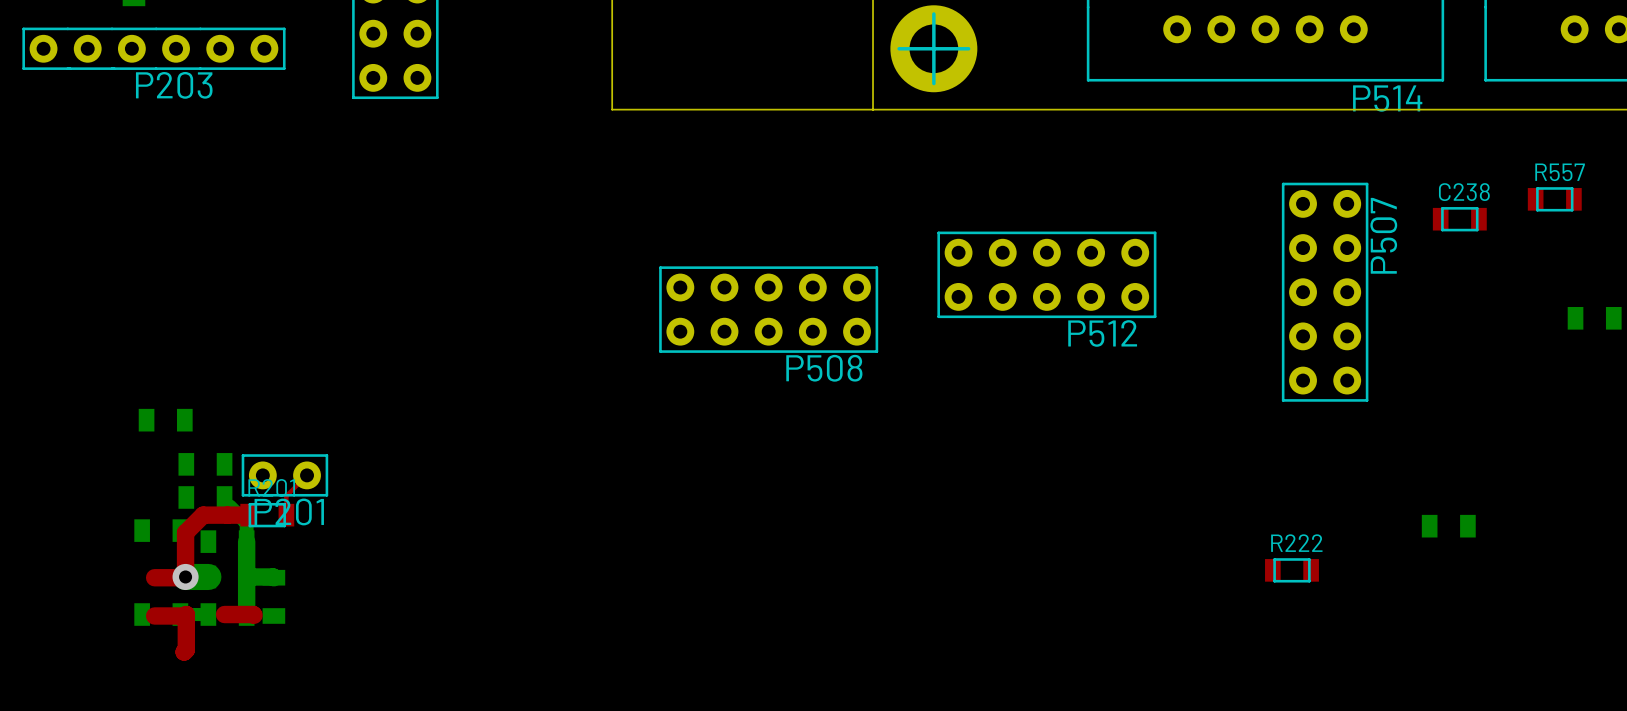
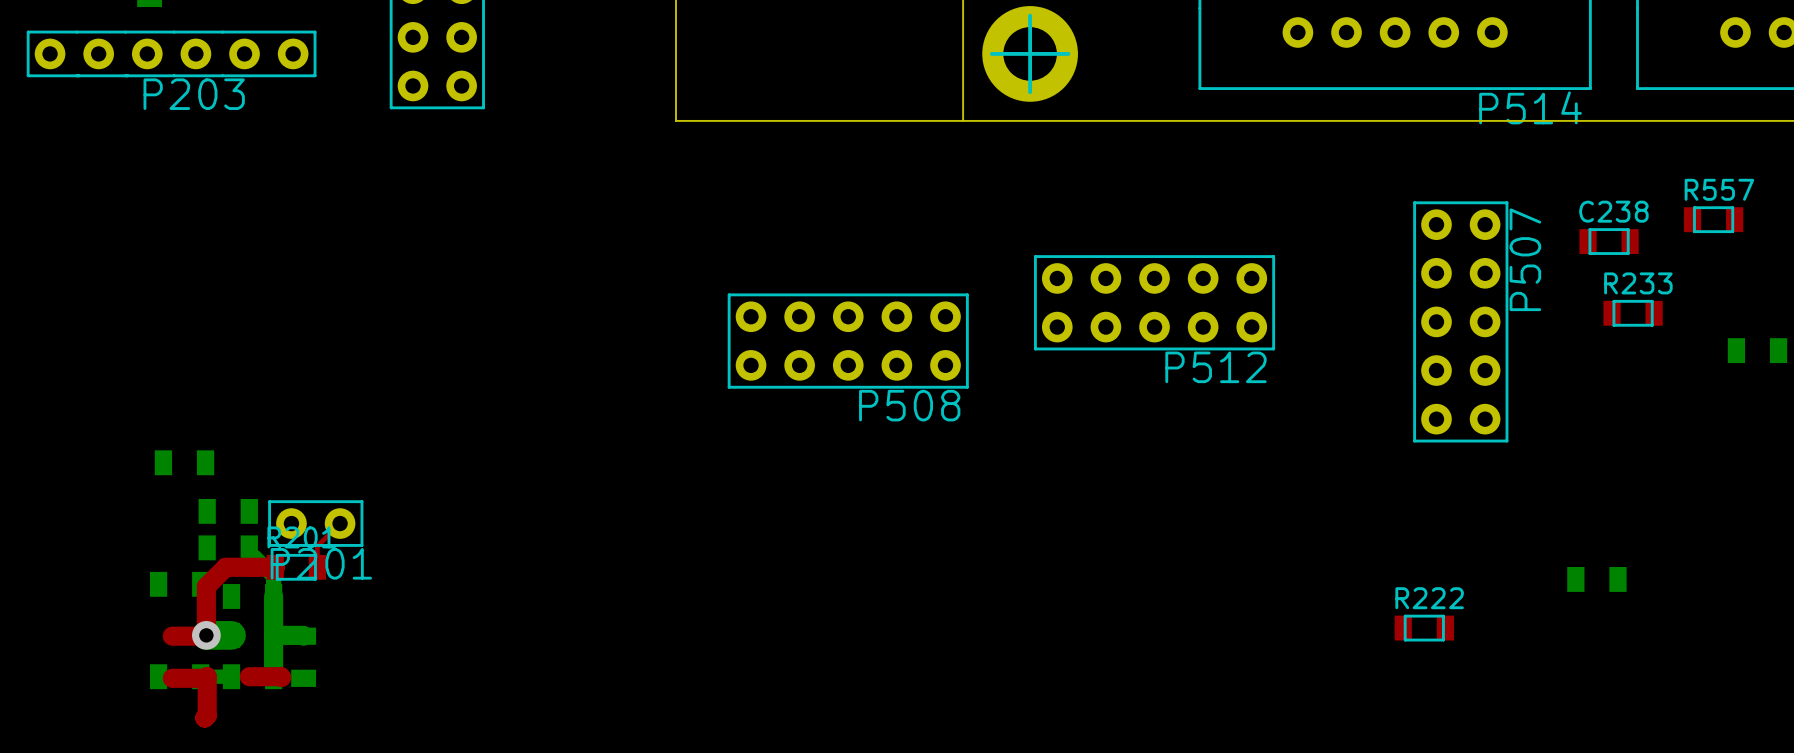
R233: none -> (1633, 313)

